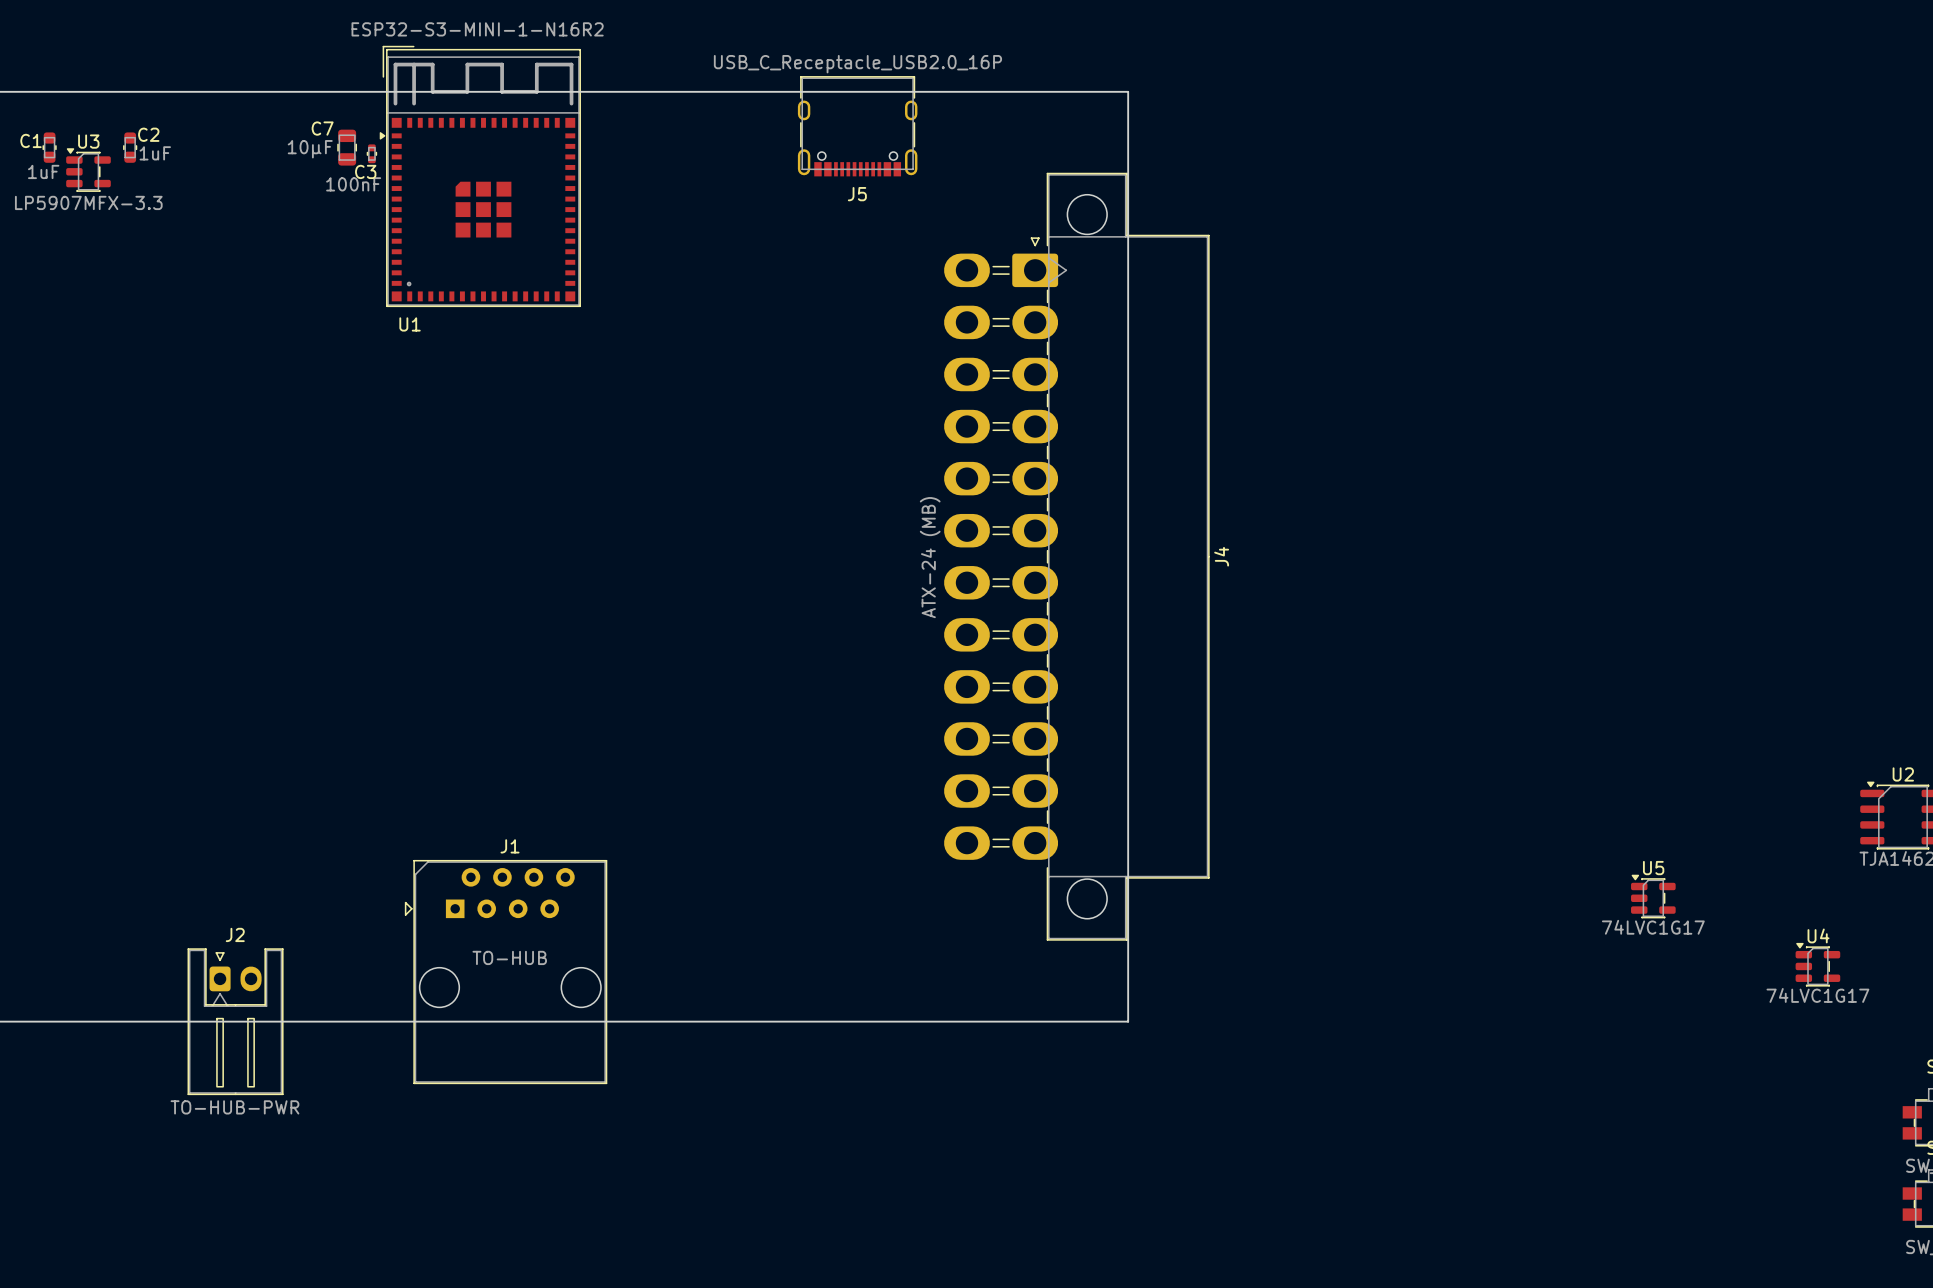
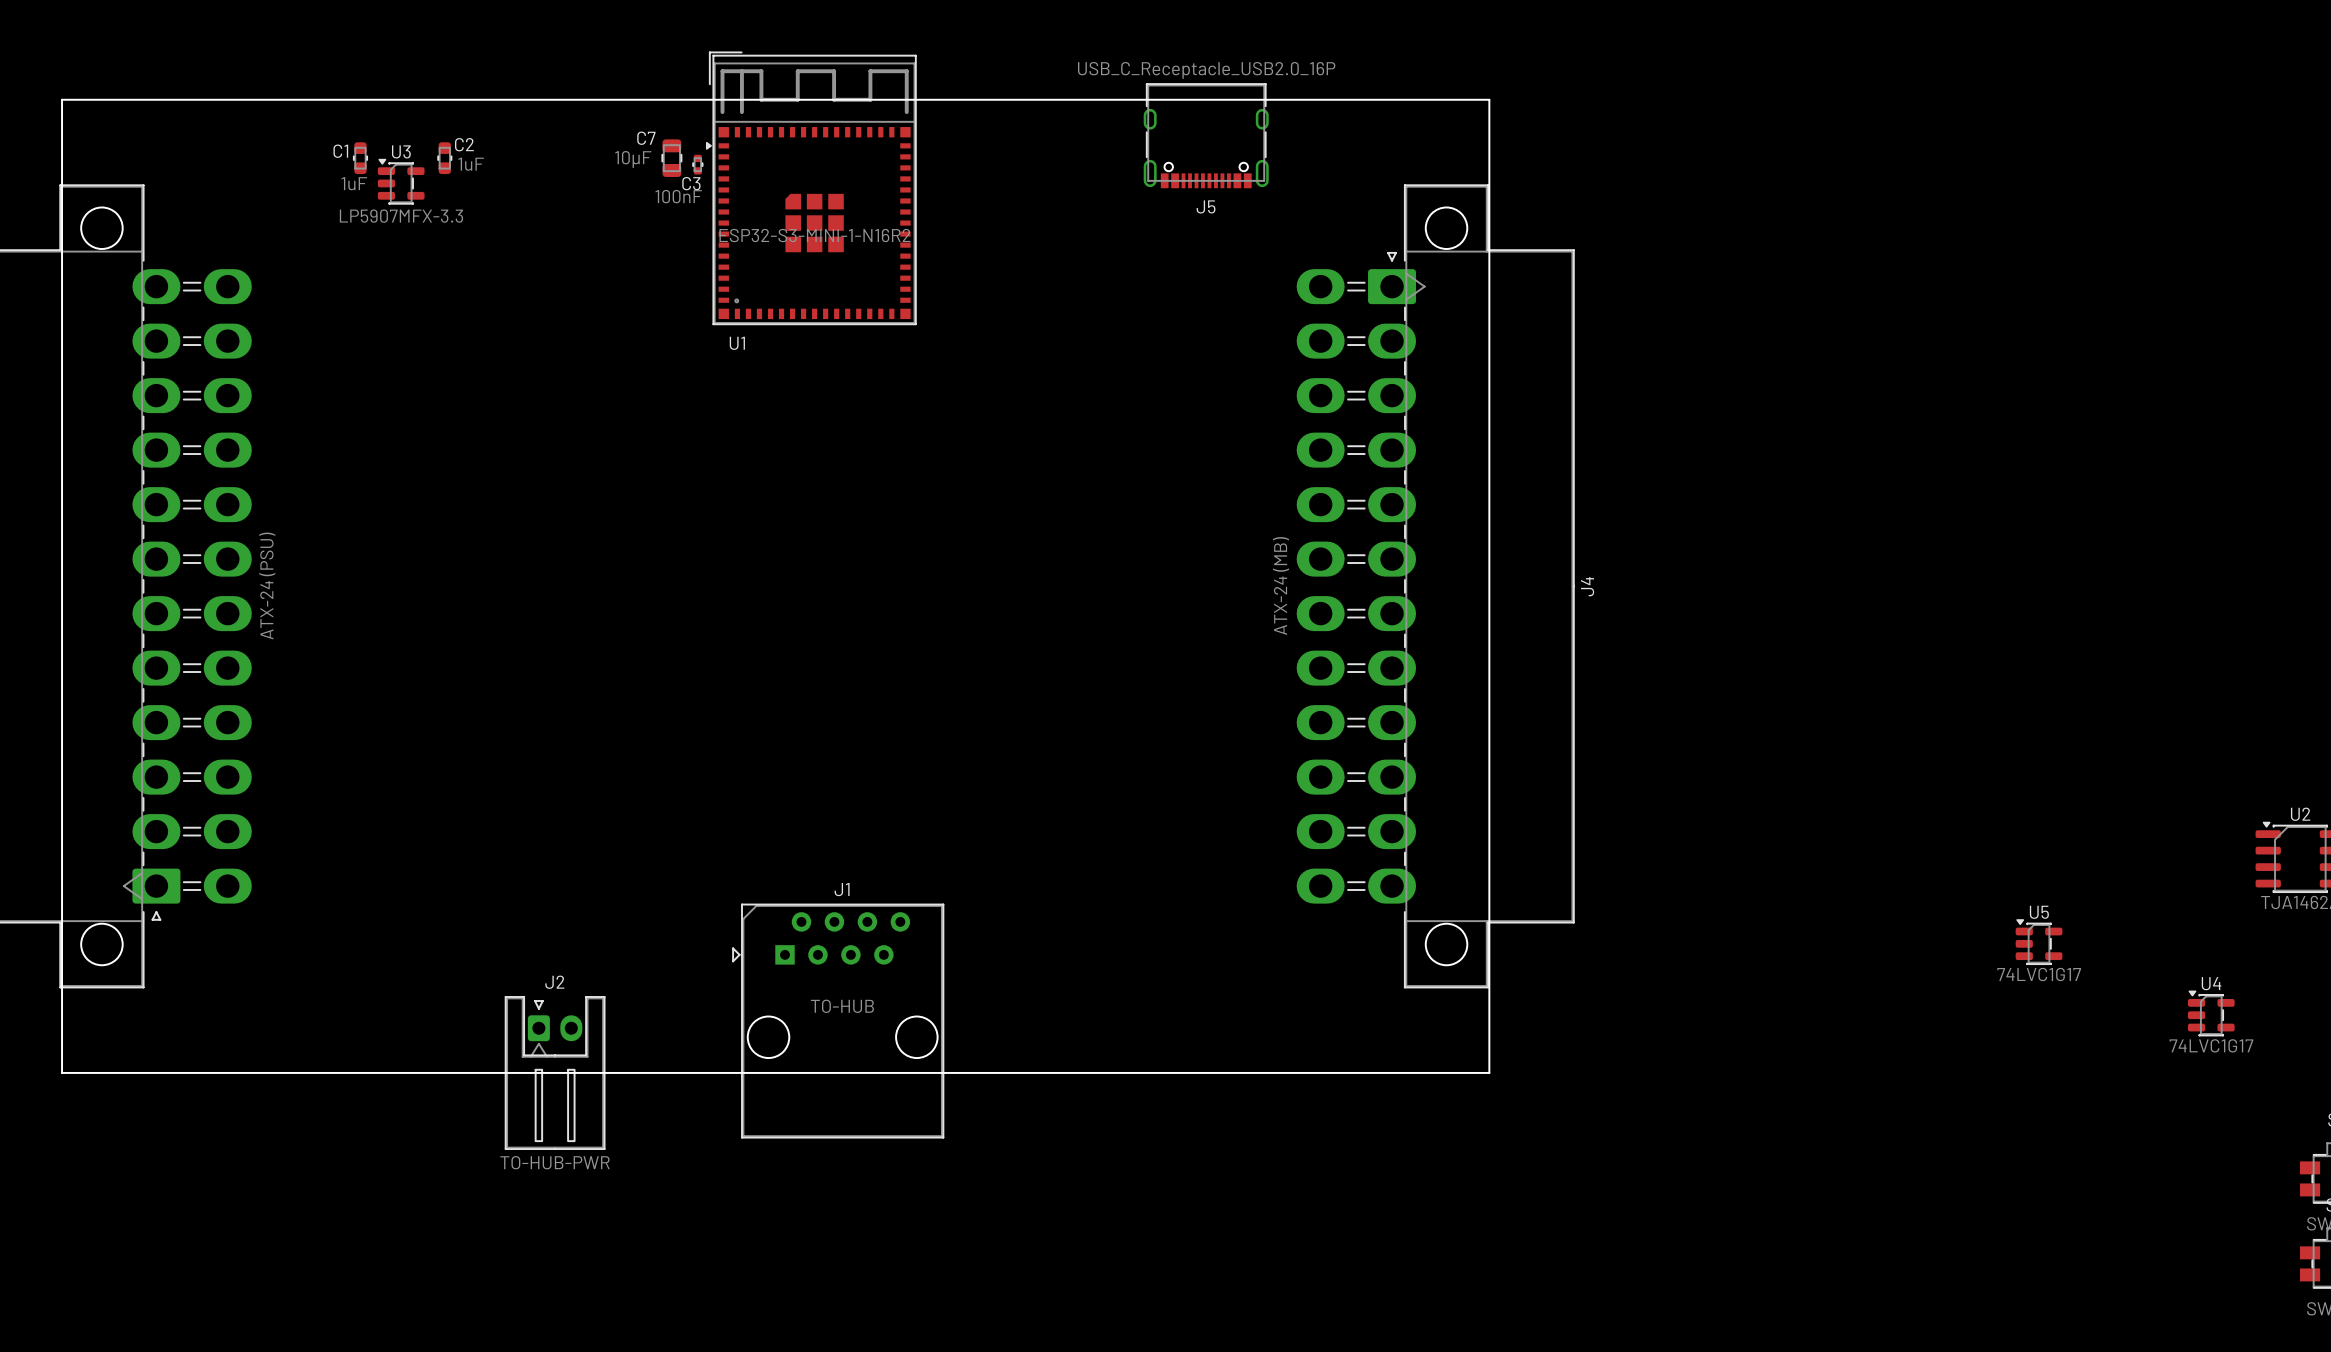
U1 value position: ESP32-S3-MINI-1-N16R2 (477, 29) -> ESP32-S3-MINI-1-N16R2 (814, 235)

